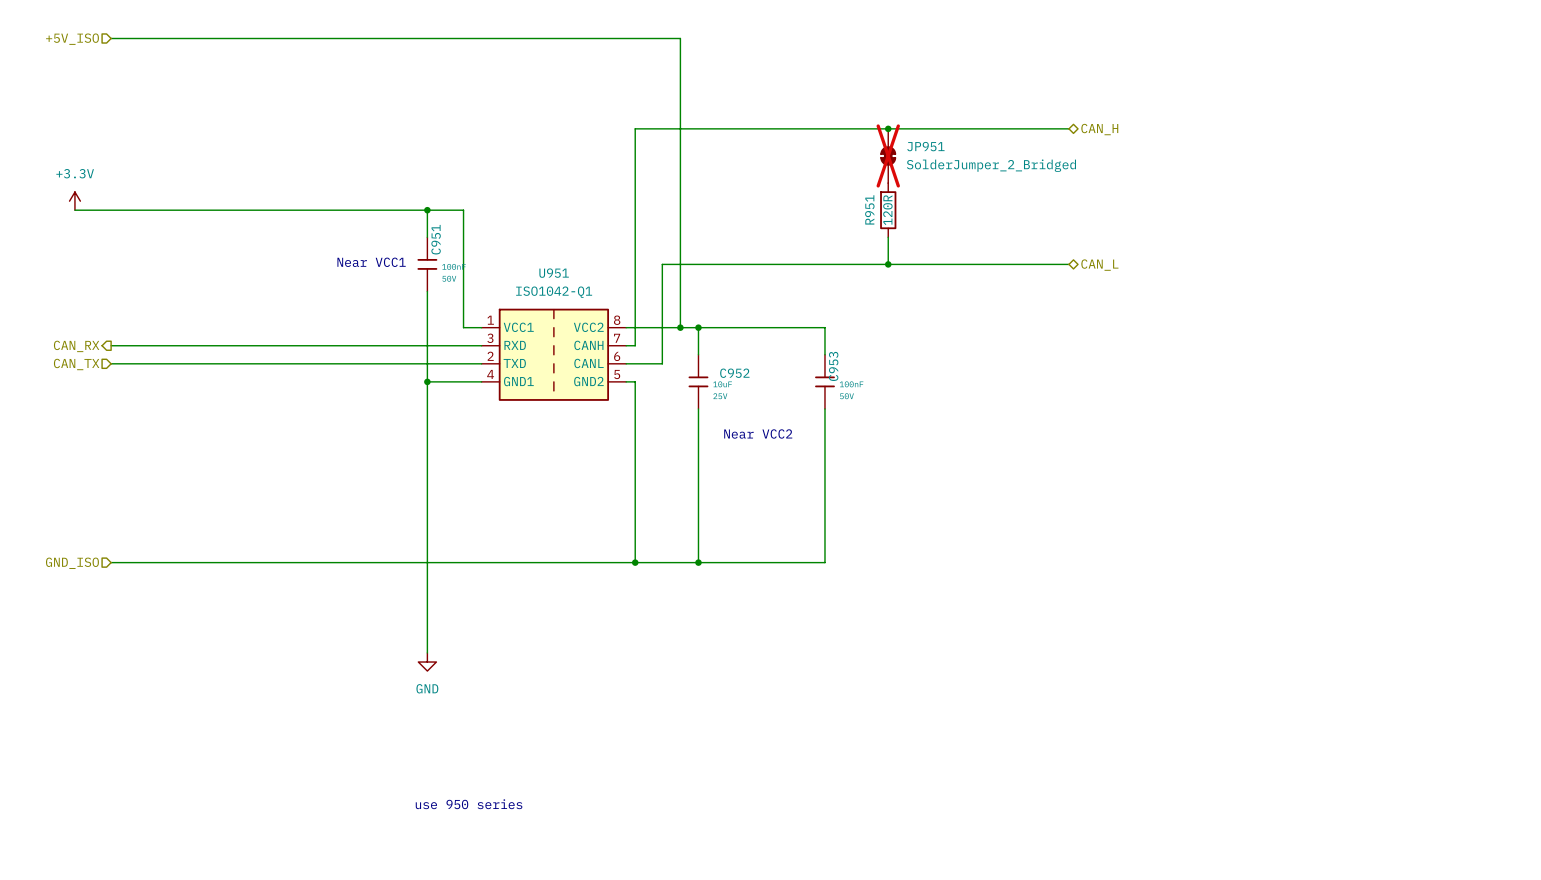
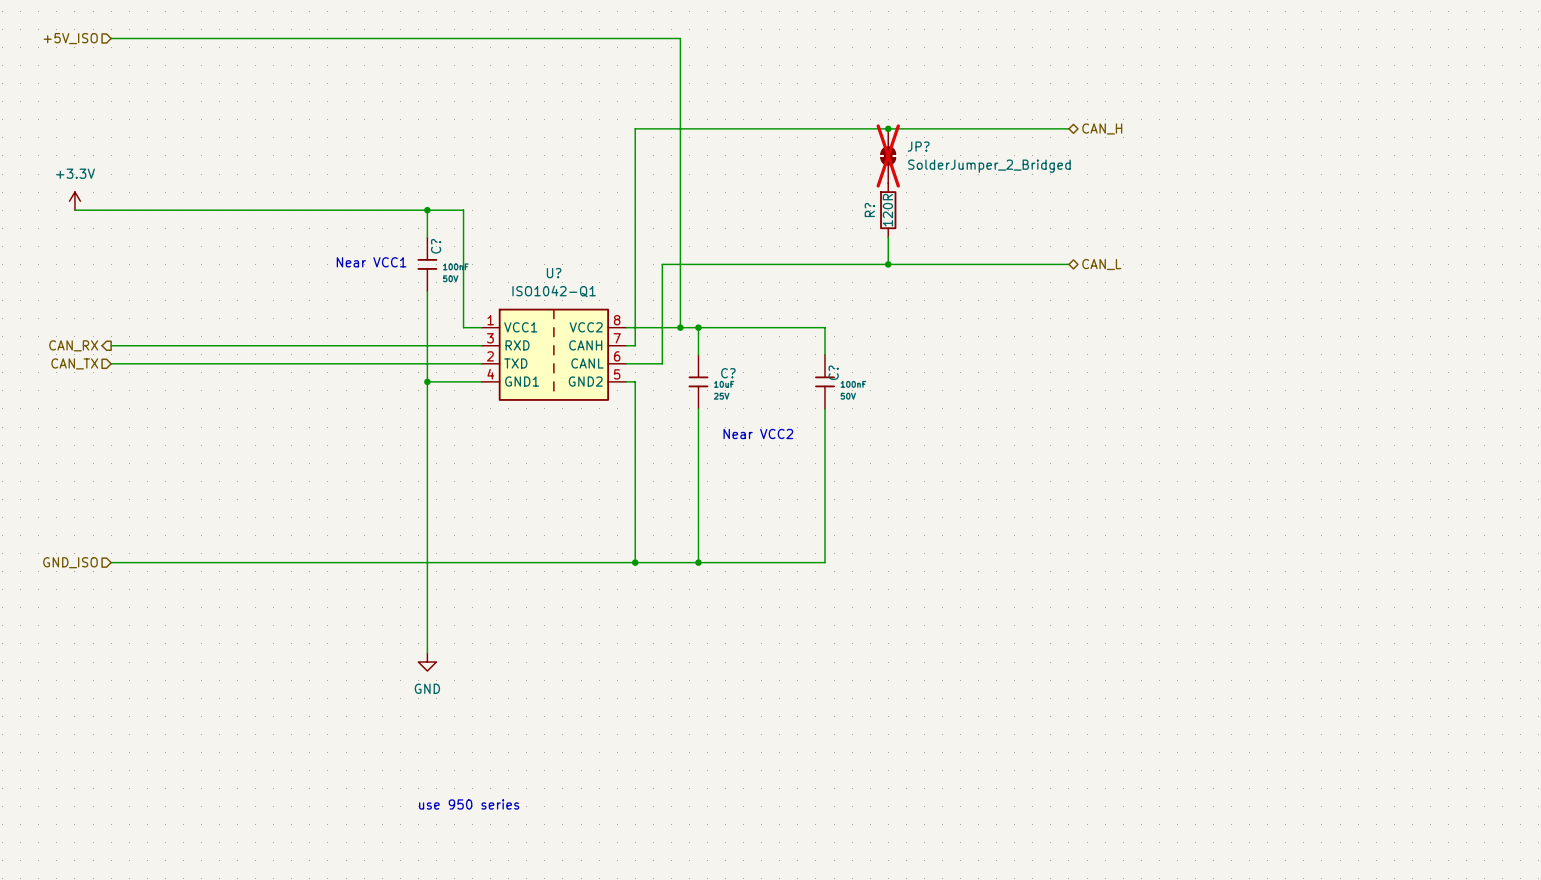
JP951 name: JP951 (925, 146) -> JP? (918, 146)
R951 name: R951 (869, 209) -> R? (869, 209)
C951 name: C951 (436, 239) -> C? (436, 246)
U951 name: U951 (554, 273) -> U? (554, 273)
C953 name: C953 (833, 366) -> C? (833, 372)
C952 name: C952 (734, 373) -> C? (728, 373)

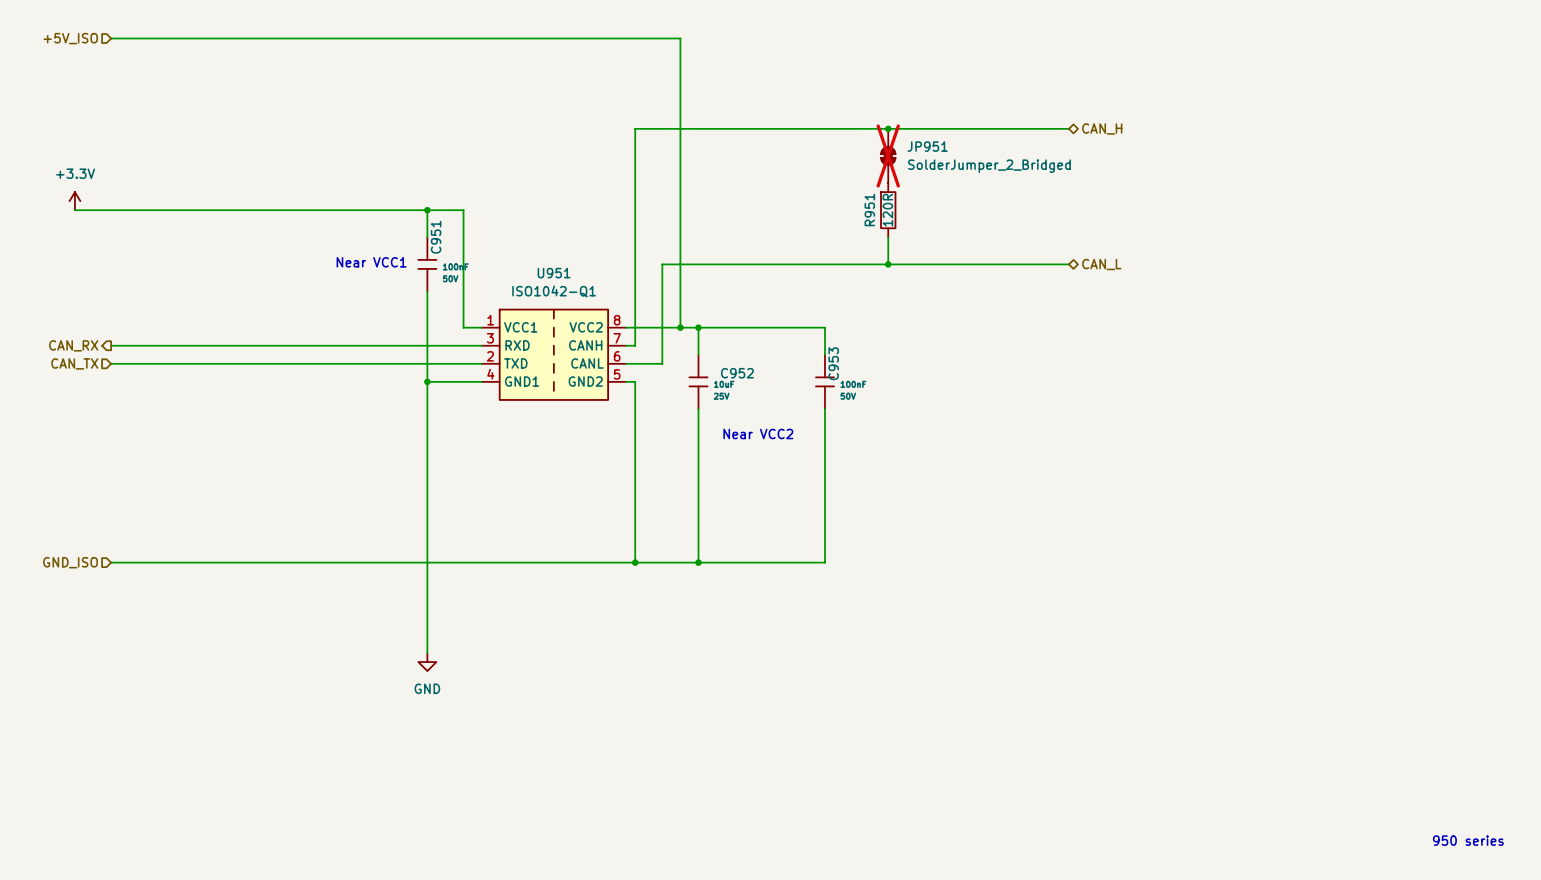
JP? name: JP? (918, 146) -> JP951 (927, 146)
R? name: R? (869, 209) -> R951 (869, 209)
C? name: C? (436, 246) -> C951 (436, 237)
U? name: U? (554, 273) -> U951 (554, 273)
C? name: C? (833, 372) -> C953 (833, 363)
C? name: C? (728, 373) -> C952 (737, 373)
text: use 950 series (469, 804) -> none
text: none -> 950 series (1468, 840)

